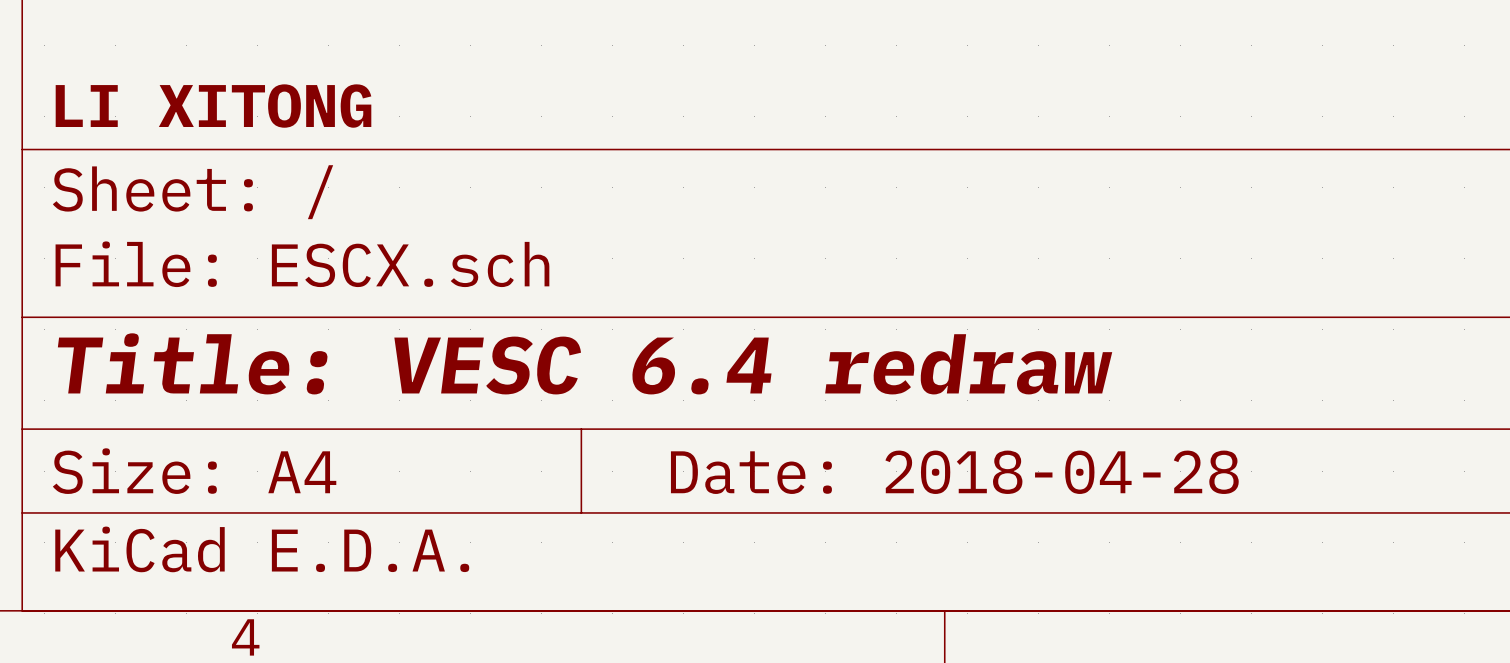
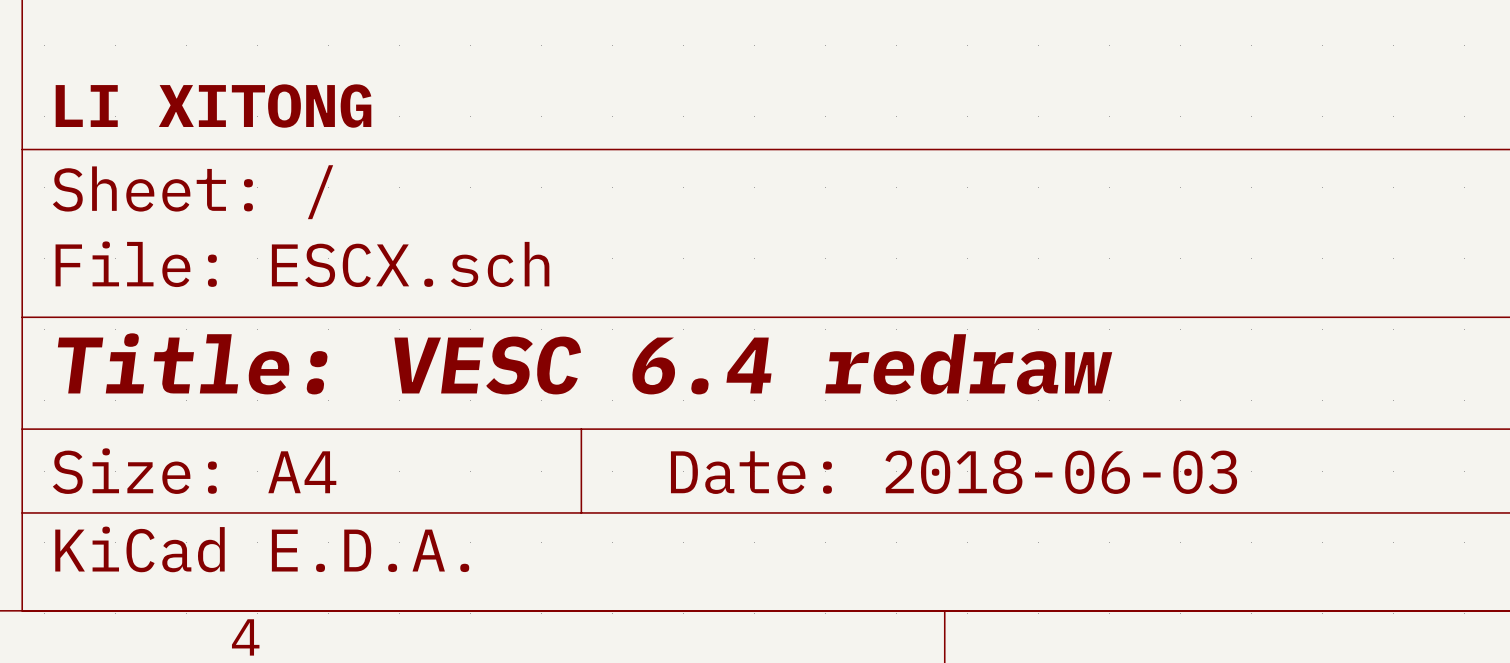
title block: Date: 2018-04-28 (954, 472) -> Date: 2018-06-03 (954, 472)

